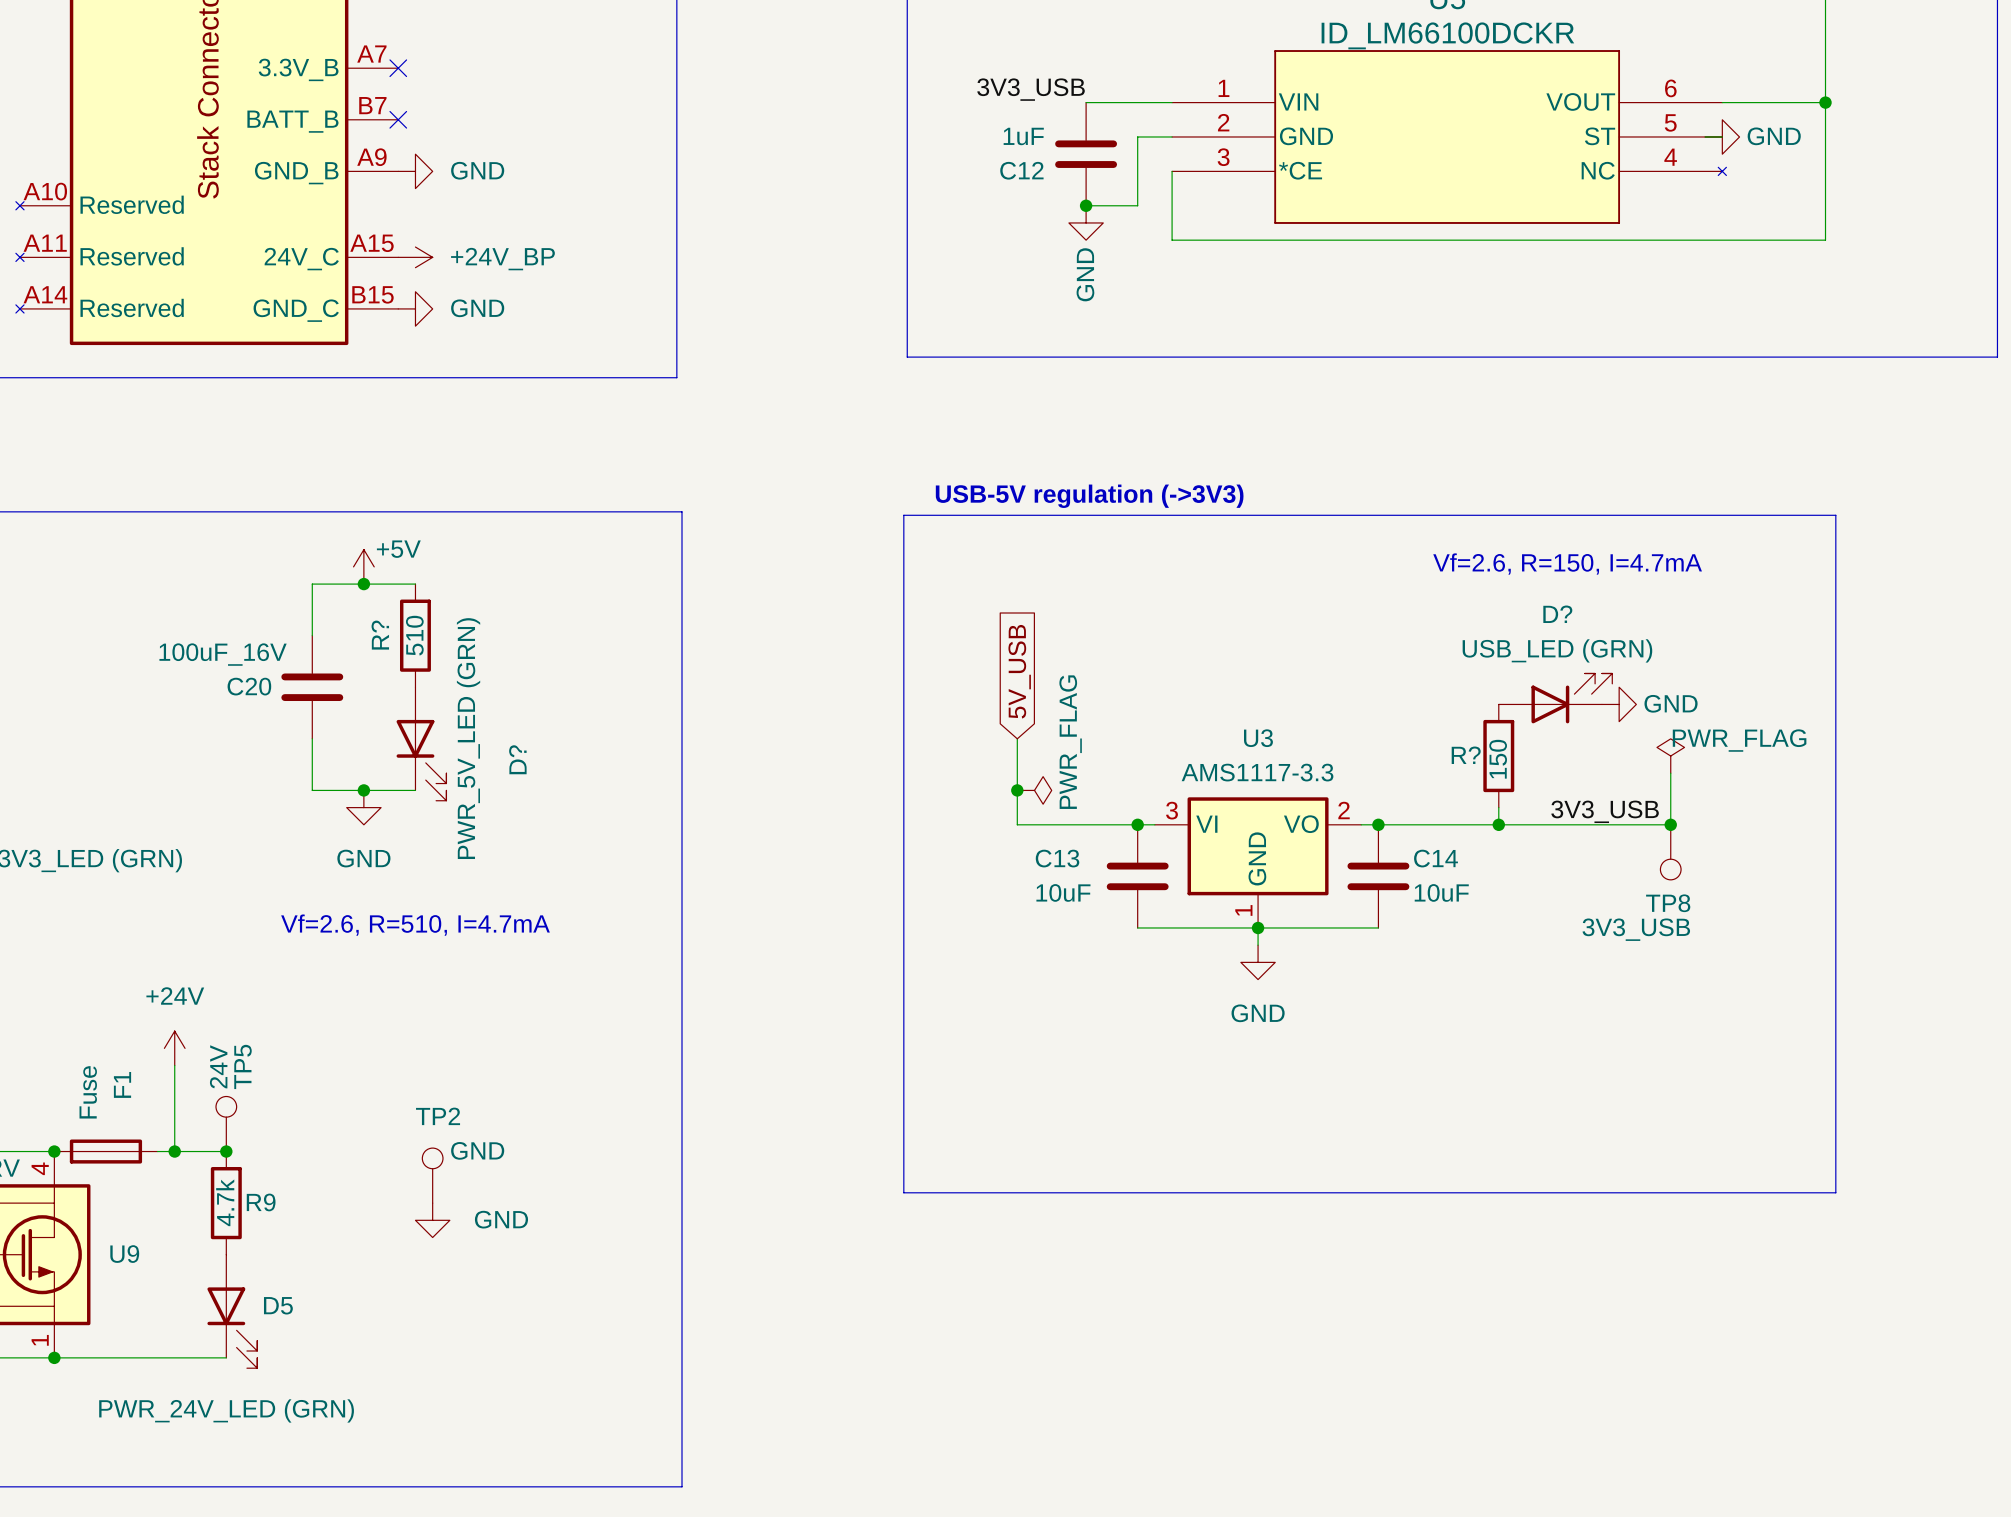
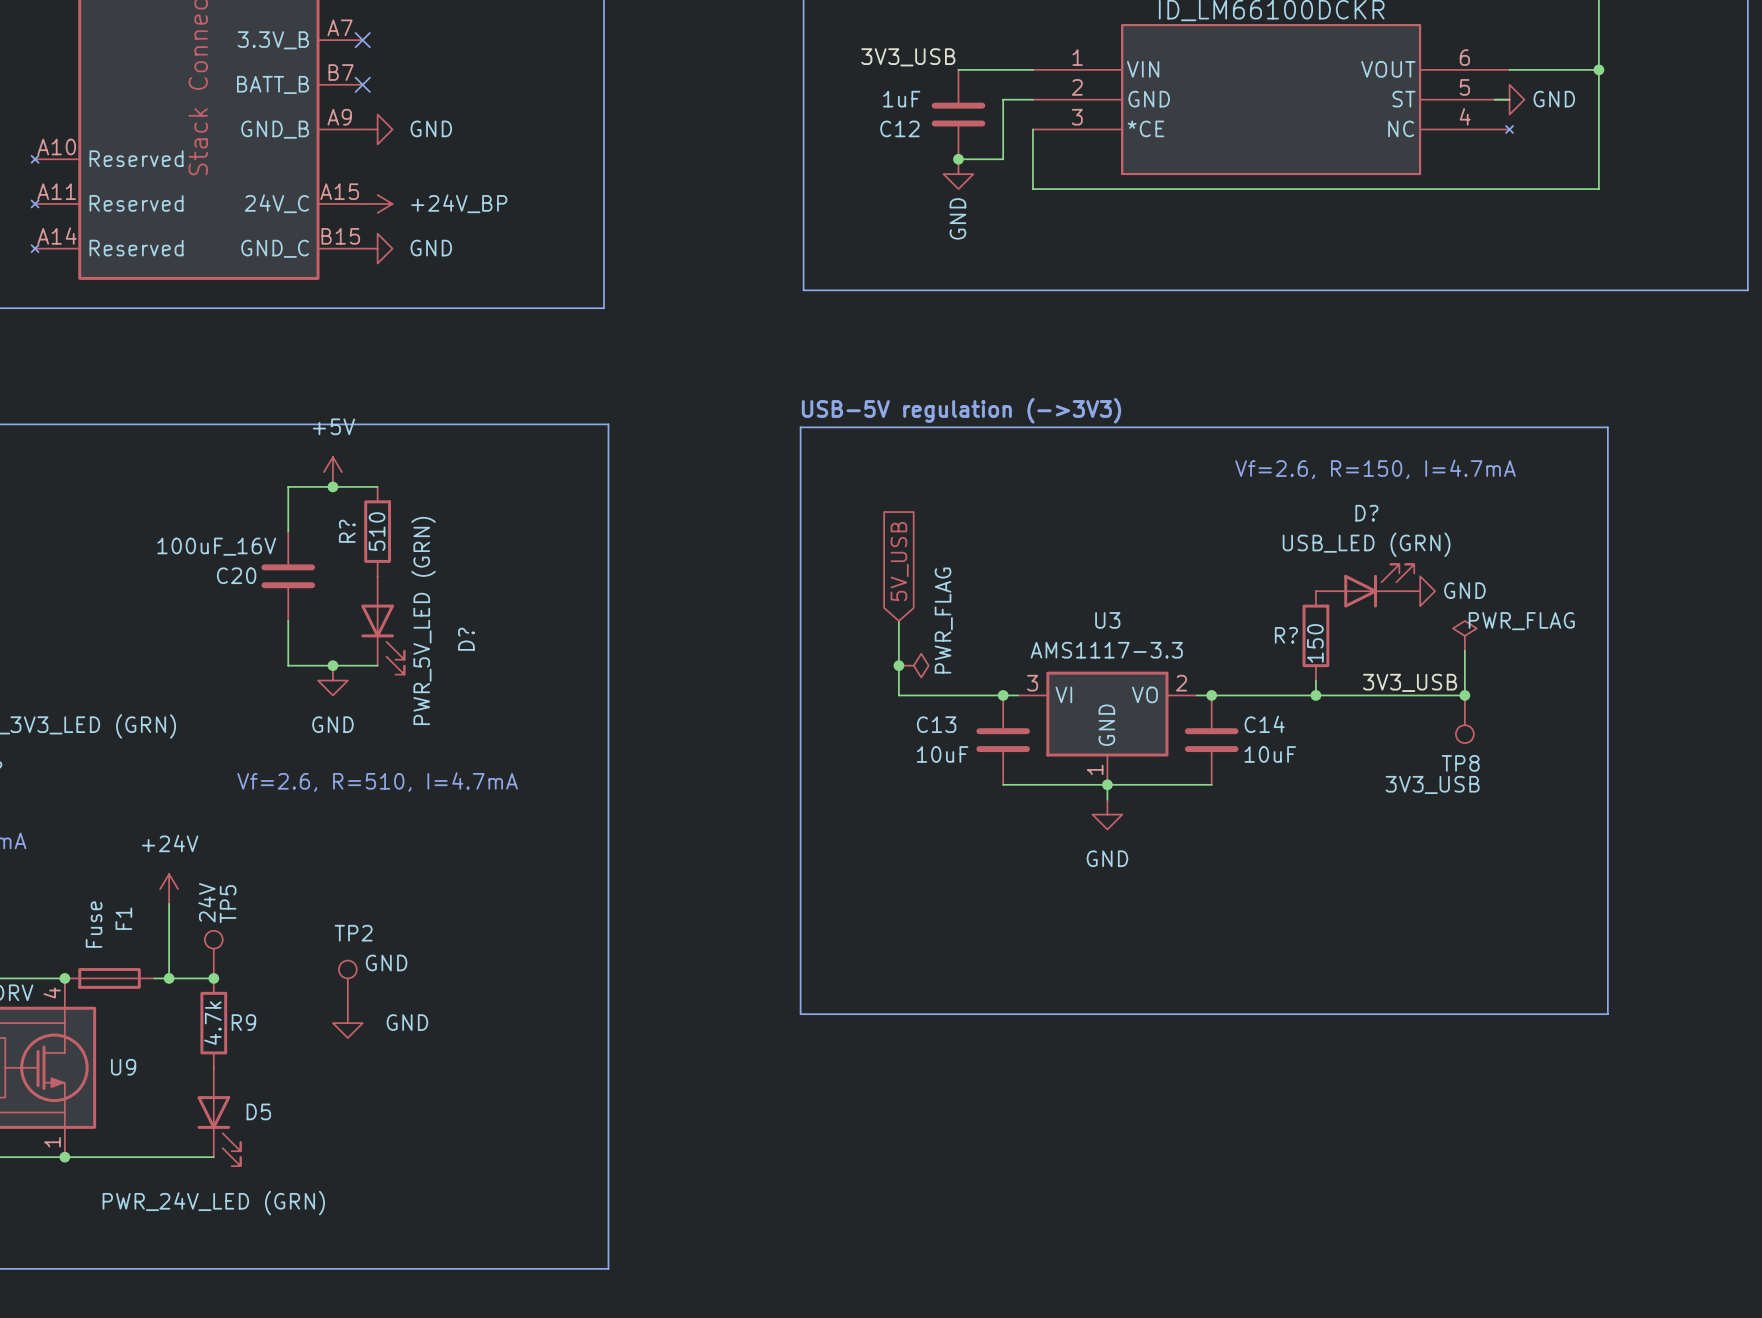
power symbol text position: +5V (398, 549) -> +5V (334, 426)
TP2 position: (432, 1175) -> (347, 984)
power symbol position: GND (432, 1220) -> GND (347, 1023)

